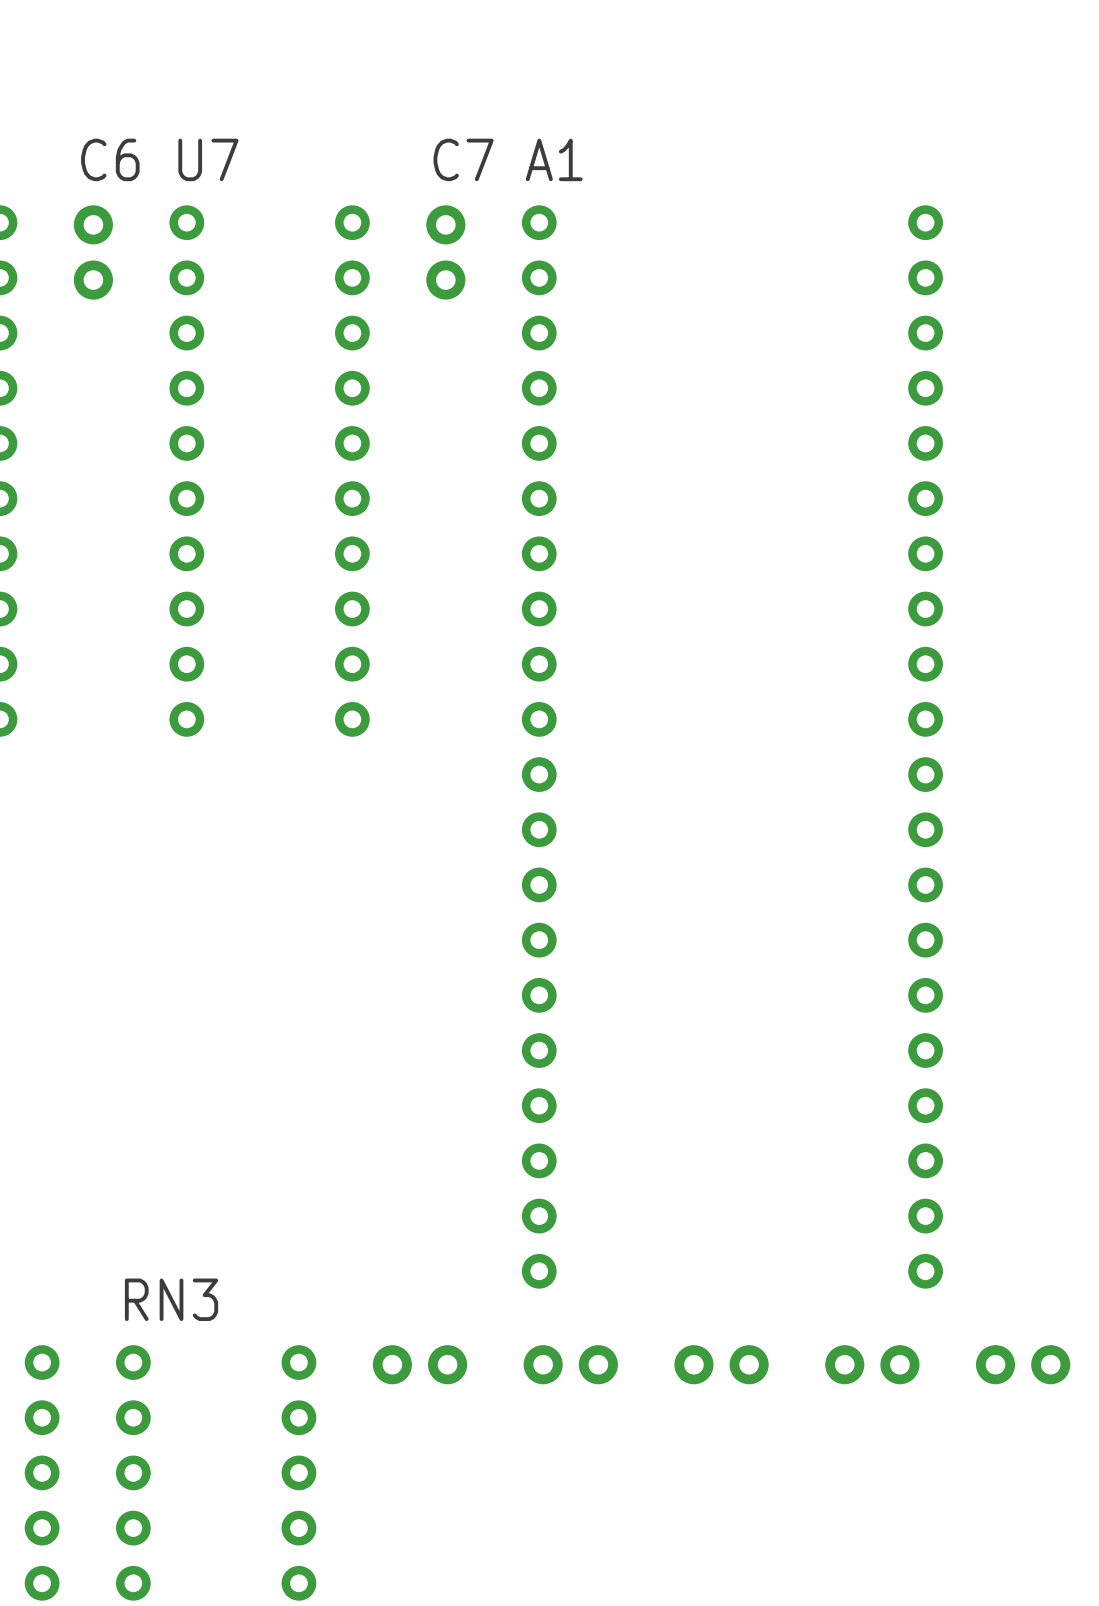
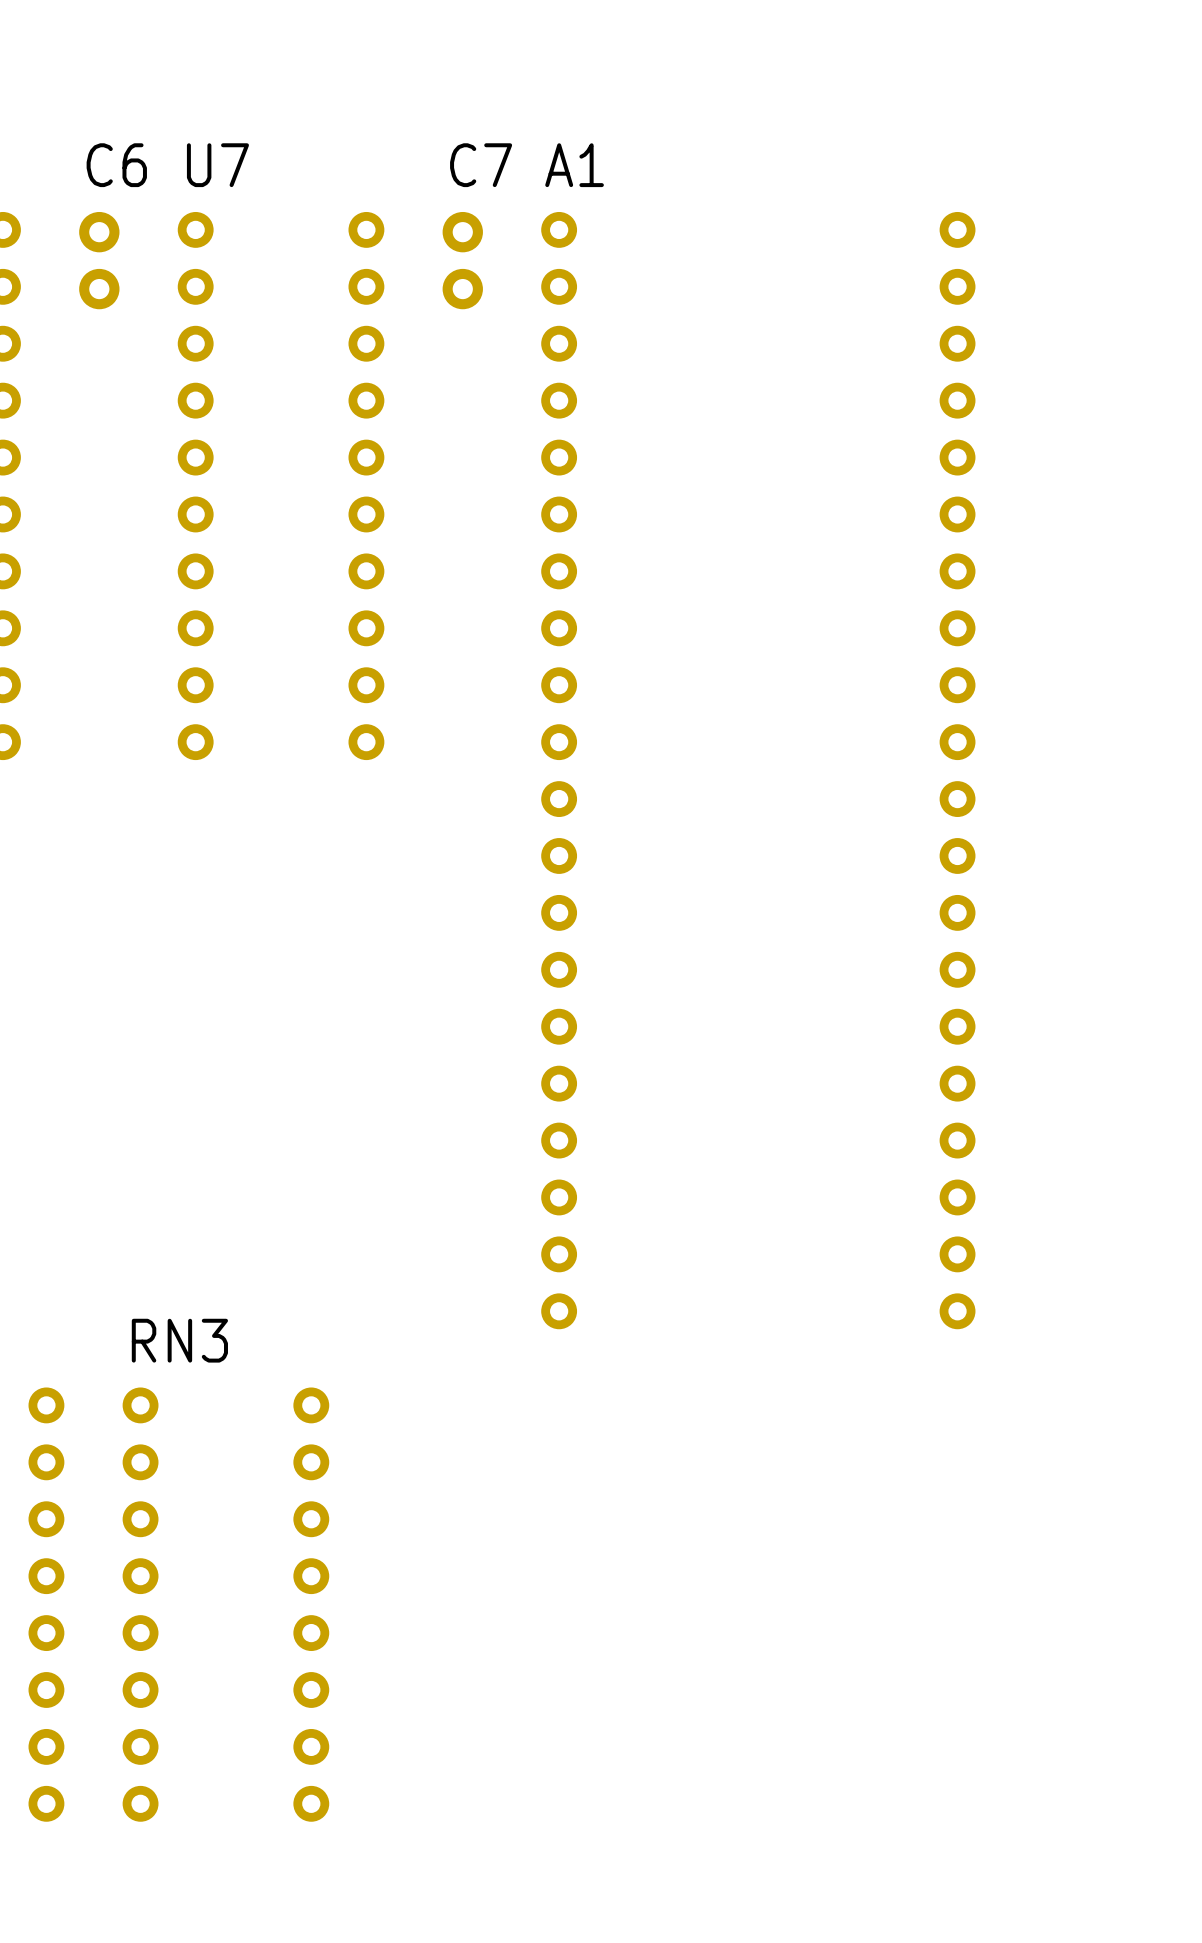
part: (419, 1364) -> none
part: (570, 1364) -> none
part: (721, 1364) -> none
part: (872, 1364) -> none
part: (1023, 1364) -> none

